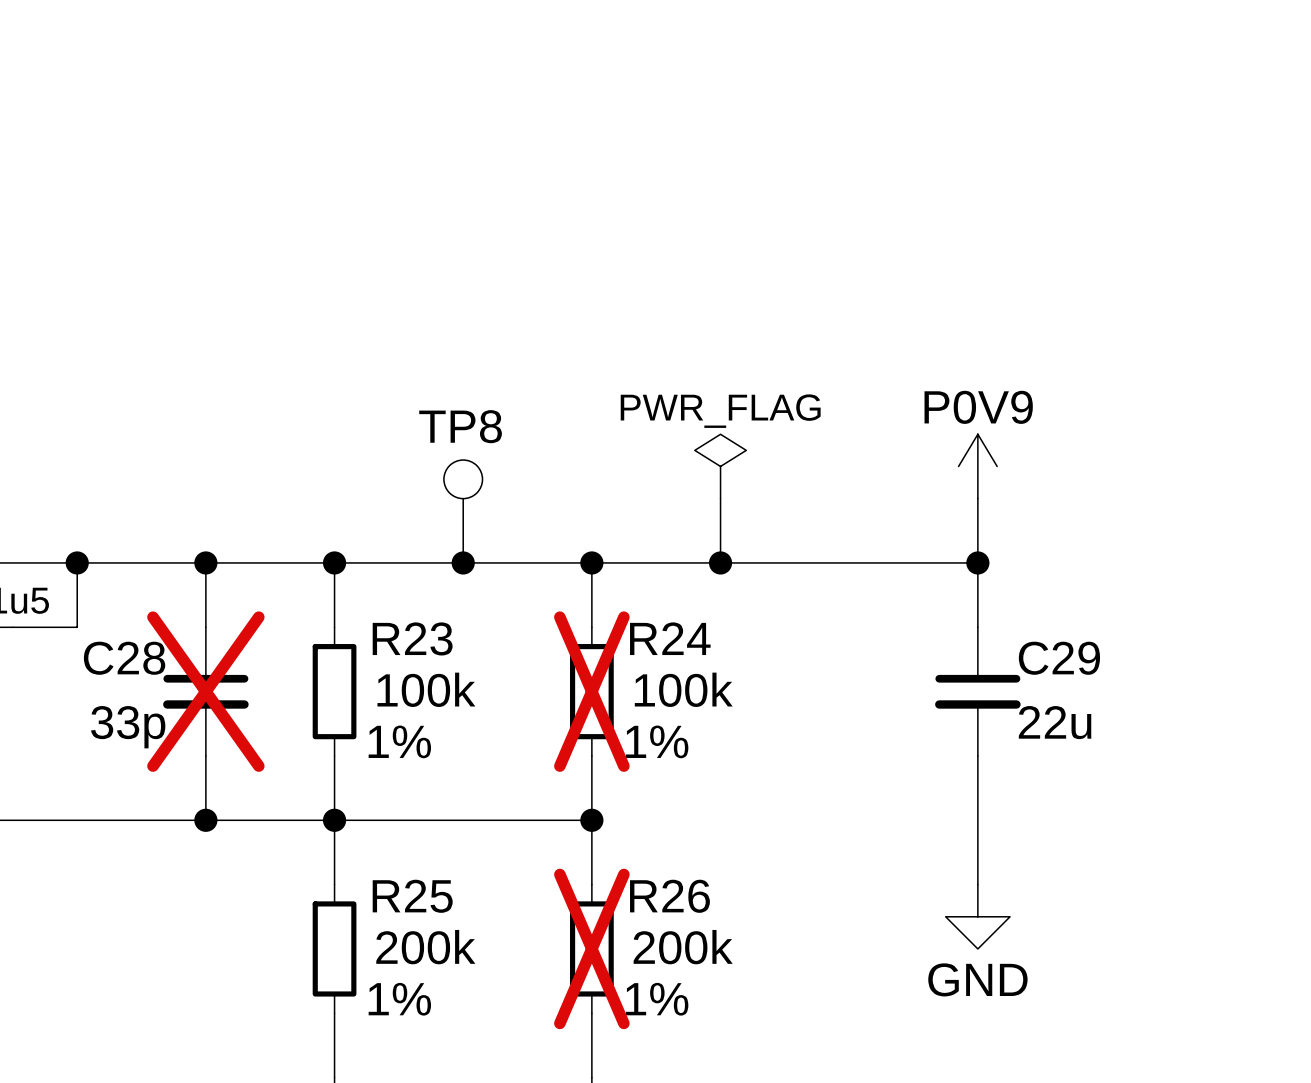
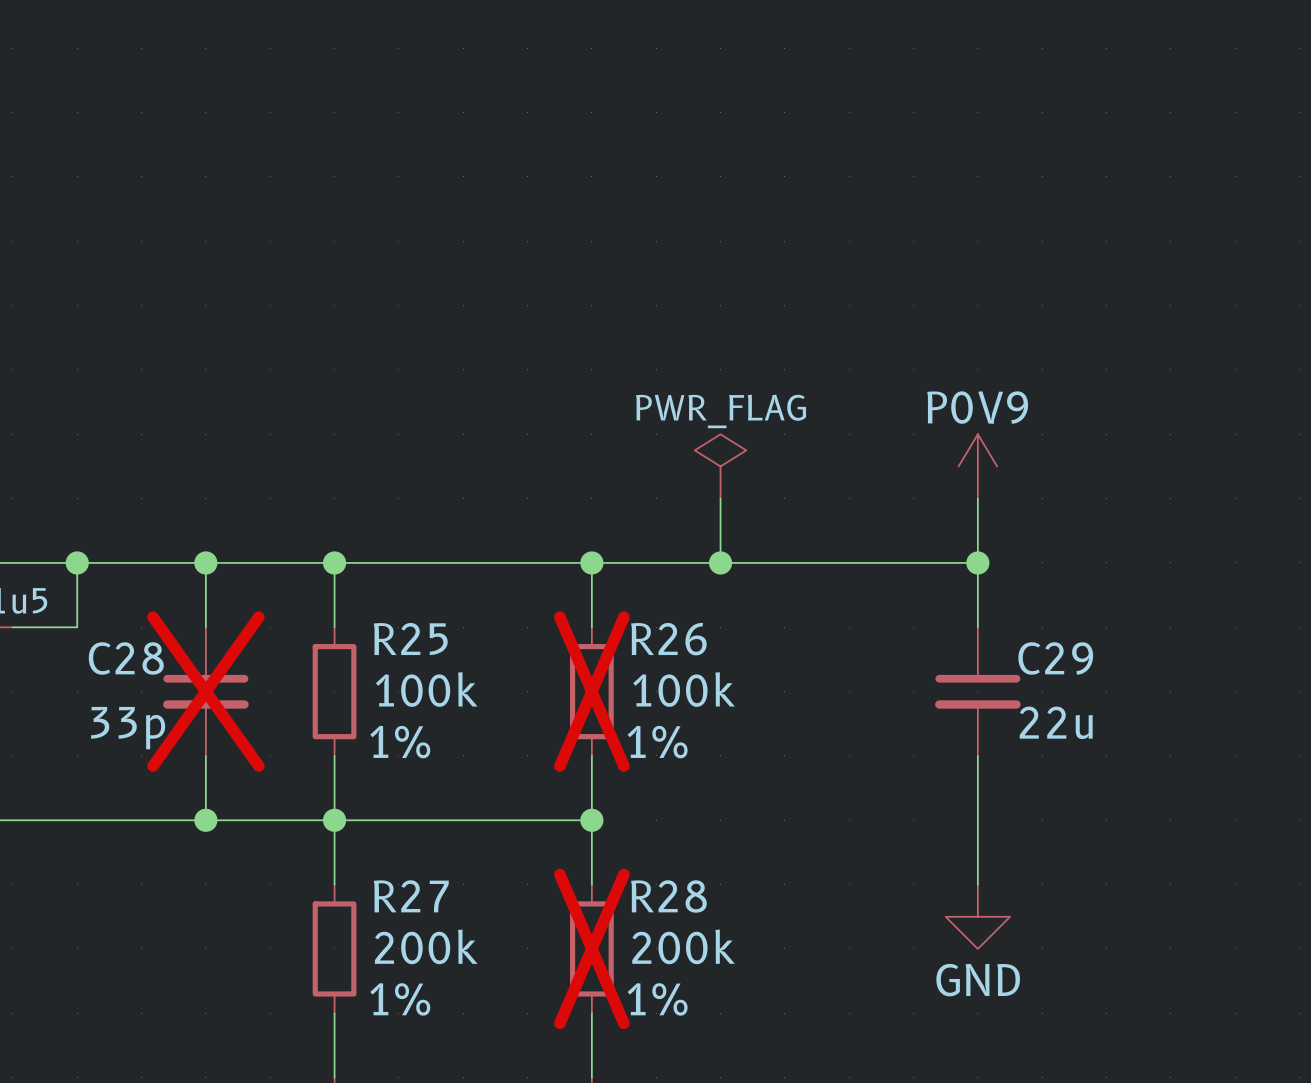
TP8: (463, 511) -> none
junction: (463, 562) -> none
R23 name: R23 (412, 638) -> R25 (410, 638)
R24 name: R24 (670, 638) -> R26 (668, 639)
R25 name: R25 (412, 896) -> R27 (411, 896)
R26 name: R26 (669, 896) -> R28 (668, 896)

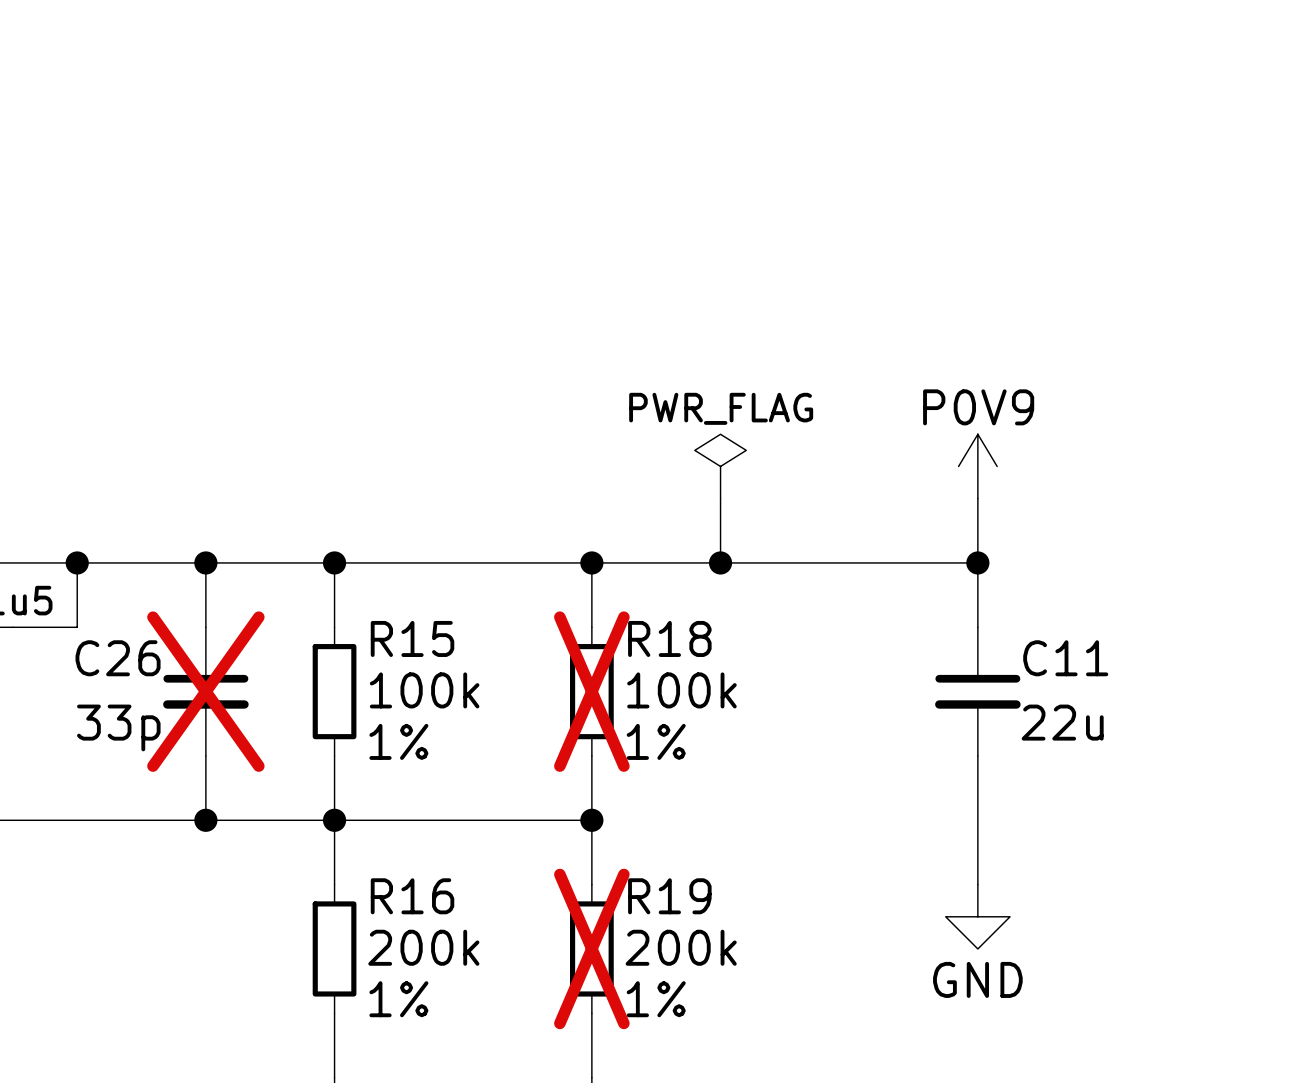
R25 name: R25 (410, 638) -> R15 (412, 638)
R26 name: R26 (668, 639) -> R18 (669, 638)
C28 name: C28 (126, 658) -> C26 (118, 658)
C29 name: C29 (1055, 658) -> C11 (1065, 658)
R27 name: R27 (411, 896) -> R16 (412, 896)
R28 name: R28 (668, 896) -> R19 (669, 896)

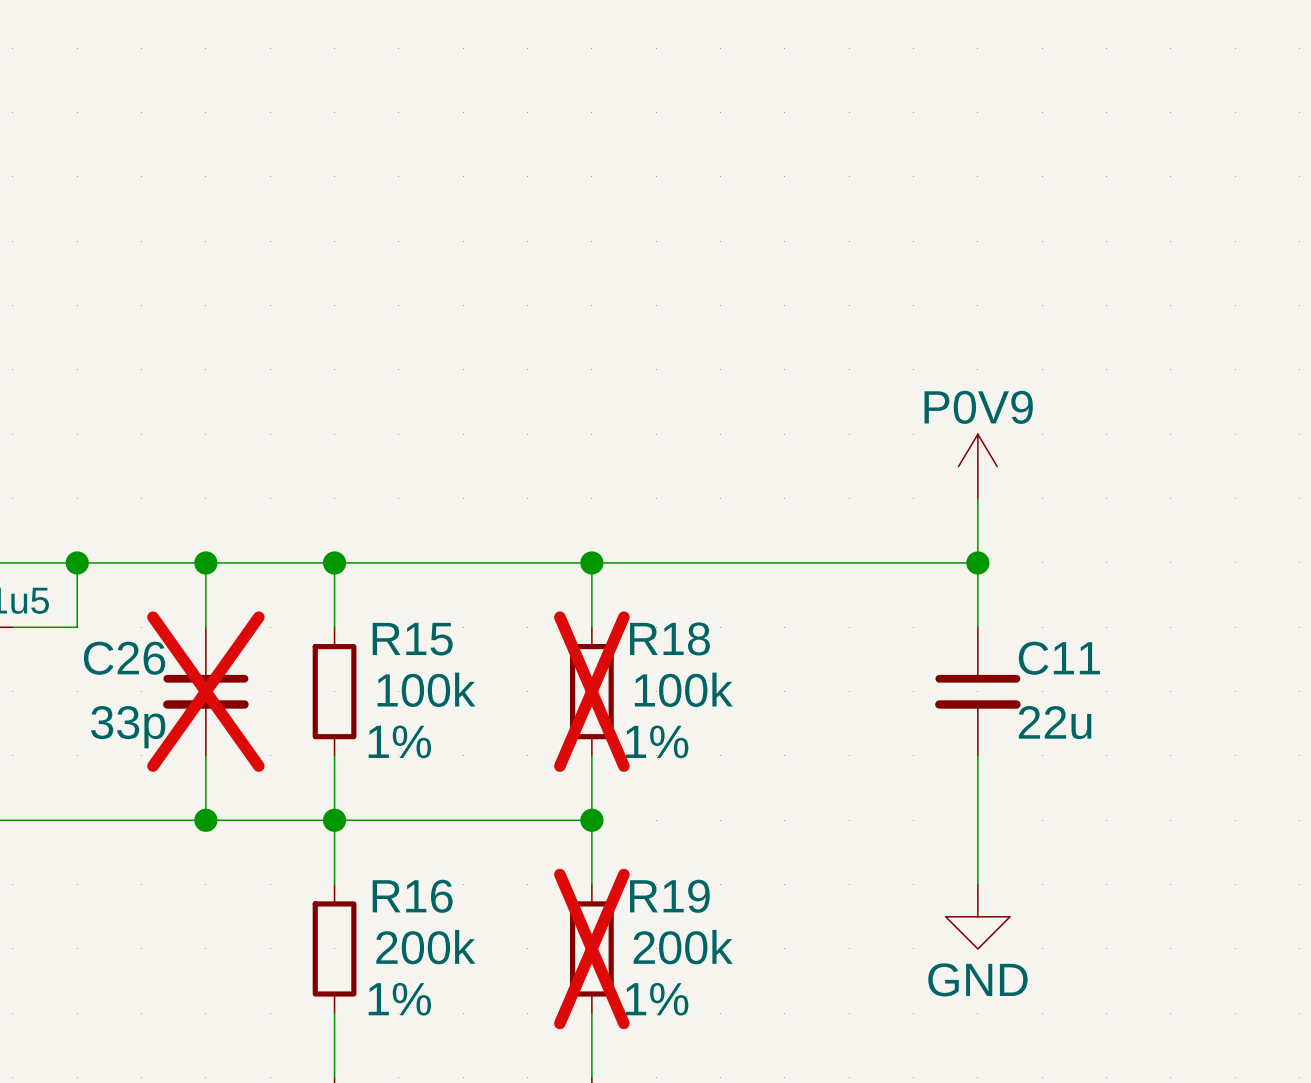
power symbol: PWR_FLAG (720, 466) -> none
wire: (720, 498) (720, 562) -> none
junction: (720, 562) -> none

